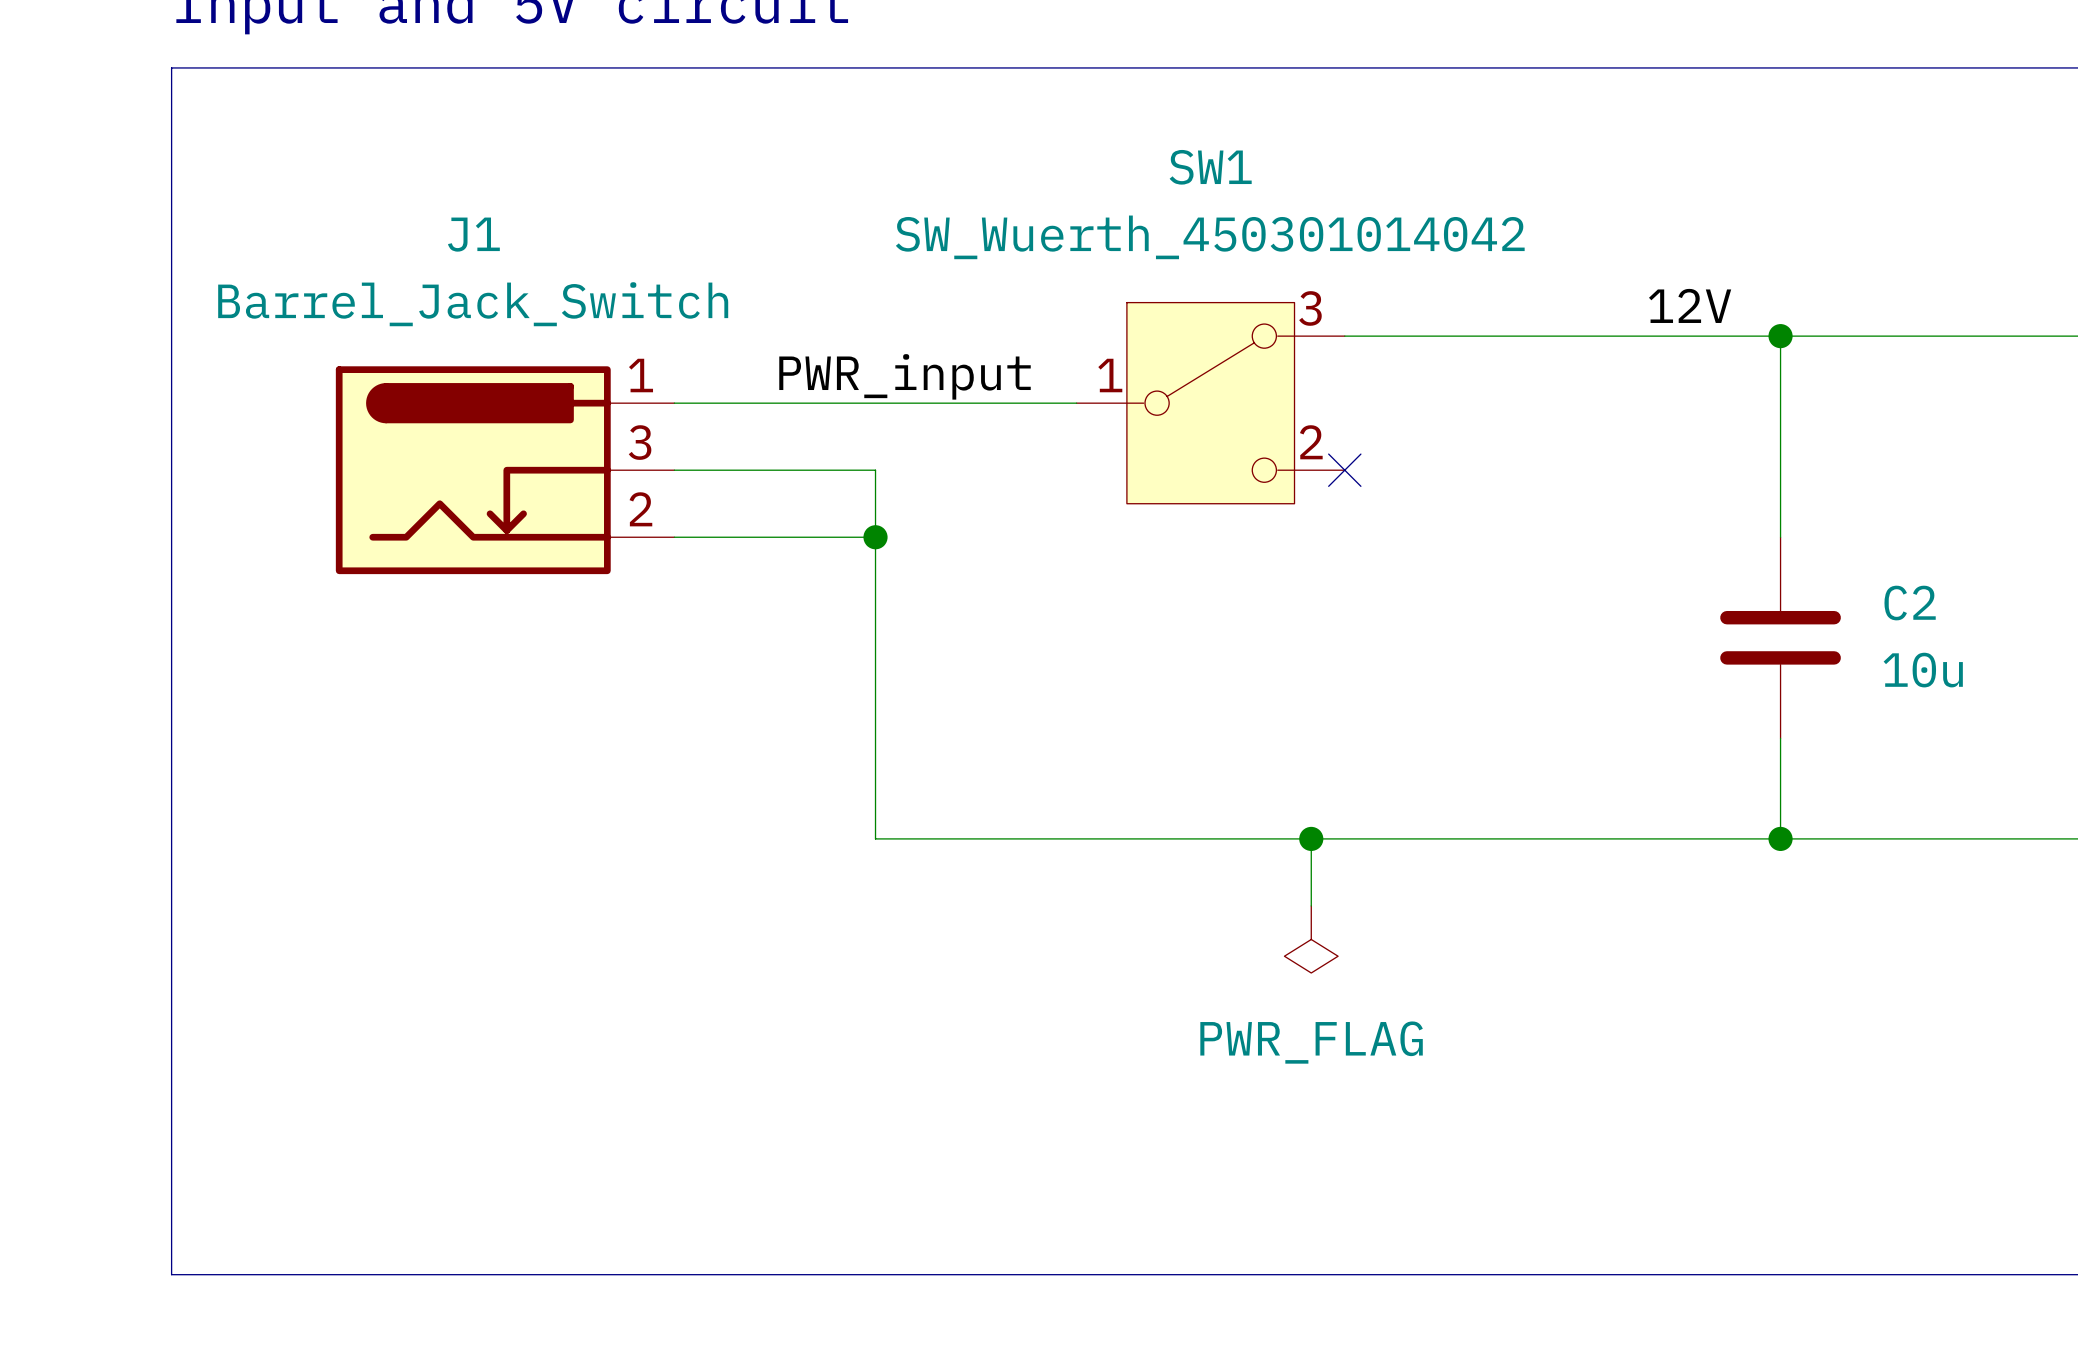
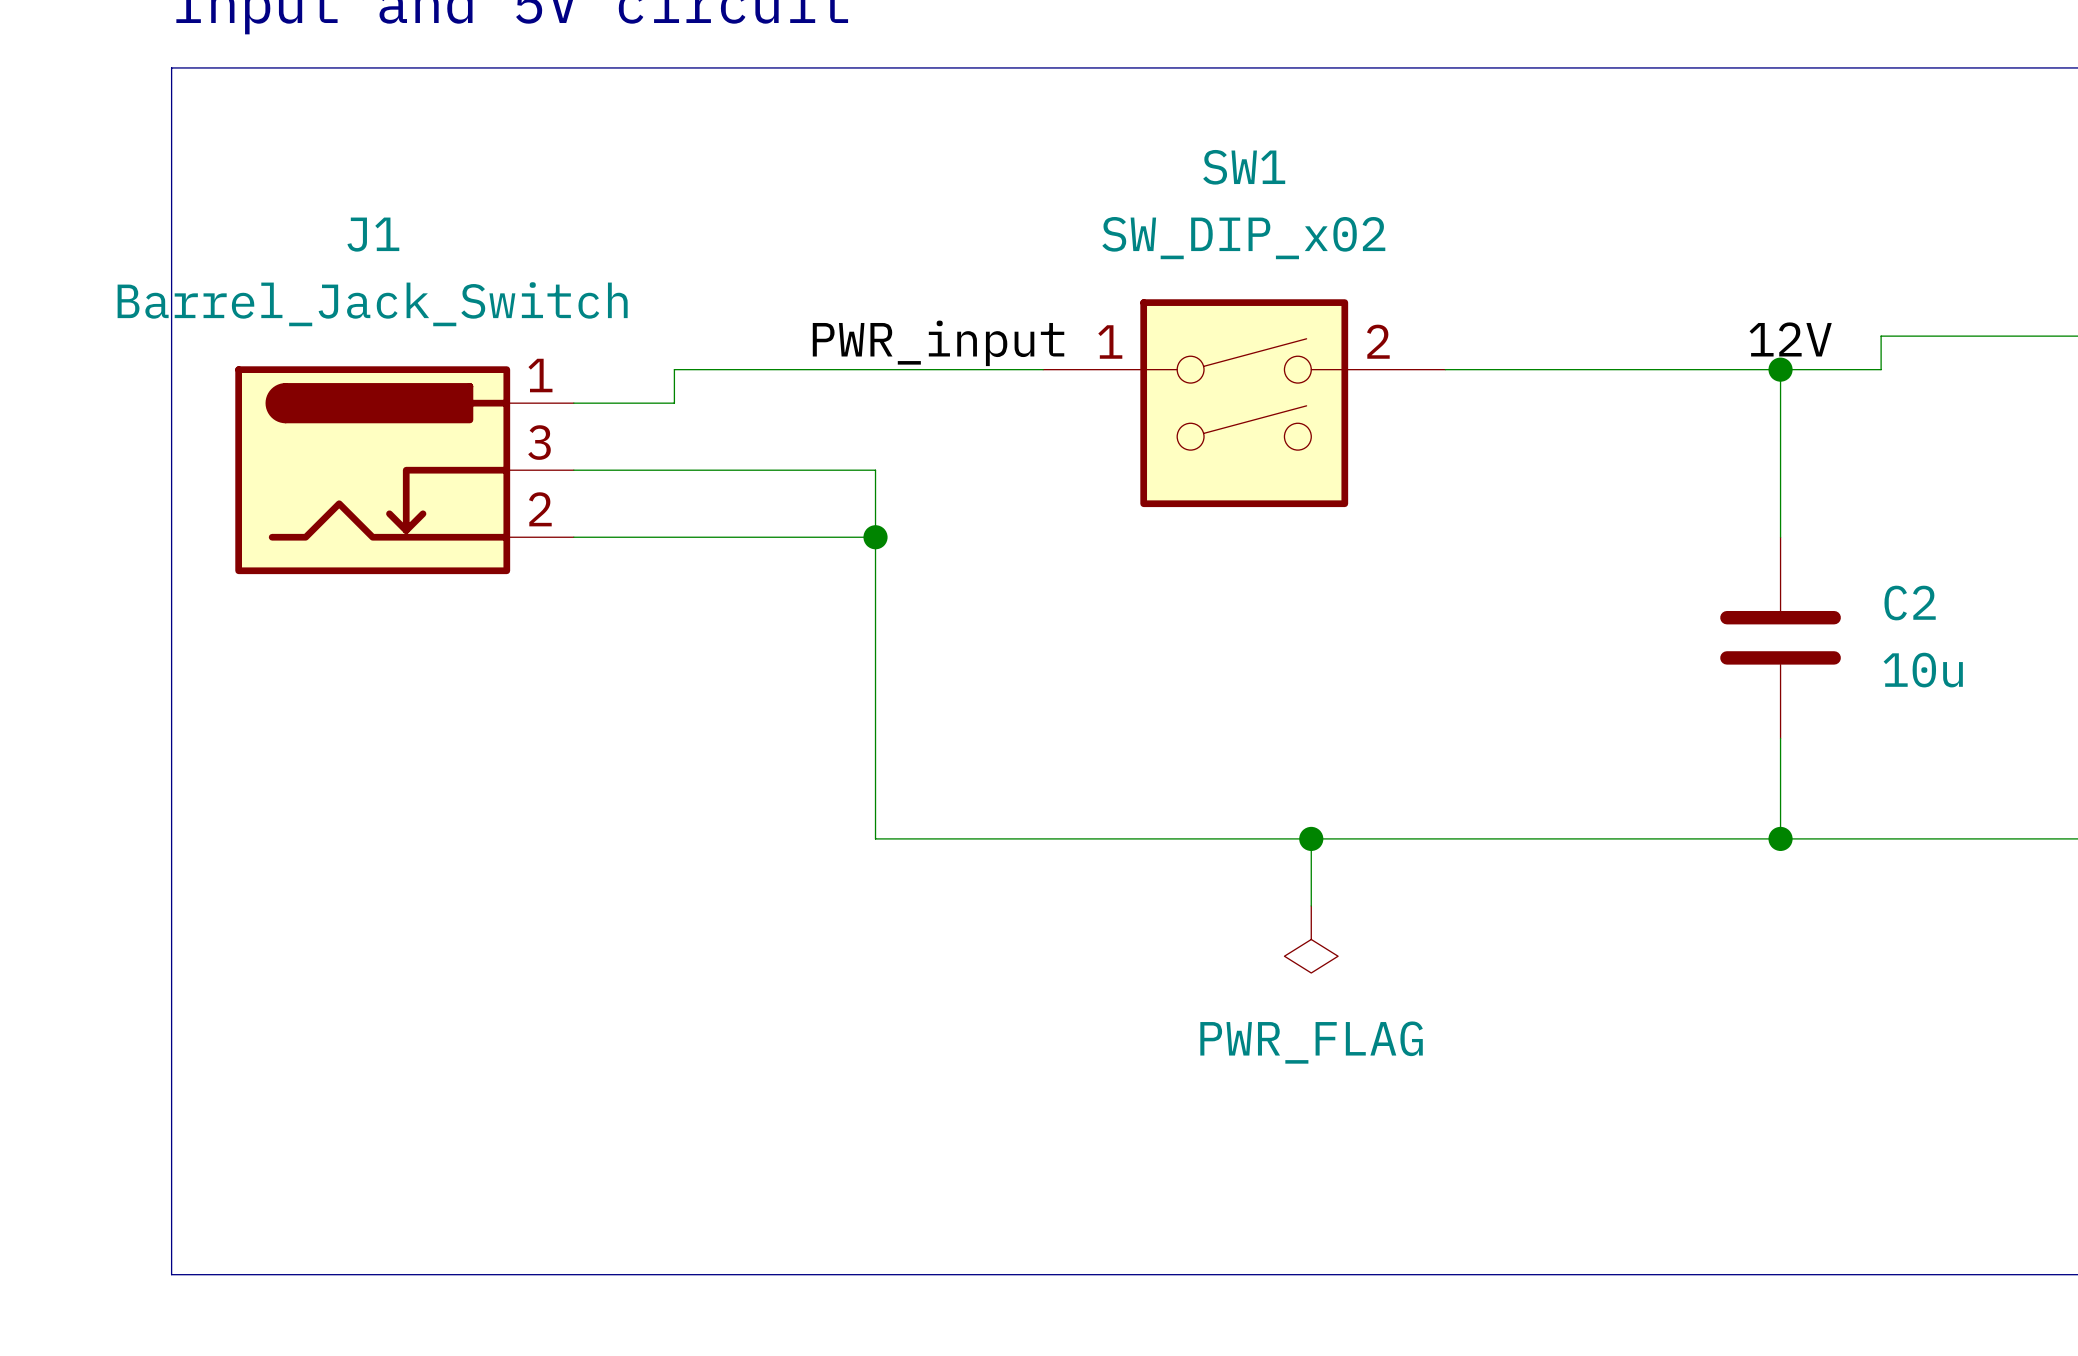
SW1 value: SW_Wuerth_450301014042 (1210, 237) -> SW_DIP_x02 (1243, 238)
SW1 symbol: [1076, 302, 1345, 504] -> [1043, 299, 1446, 508]
label position: 12V (1690, 305) -> 12V (1790, 339)
wire: (1344, 336) (1881, 336) -> (1445, 369) (1881, 369) (1881, 336)
junction position: (1780, 336) -> (1780, 369)
wire: none -> (1043, 369) (674, 369) (674, 403) (573, 403)
label position: PWR_input (905, 376) -> PWR_input (938, 343)
wire: (674, 403) (1076, 403) -> none
J1 position: (505, 470) -> (404, 470)
no-connect mark: (1344, 470) -> none

